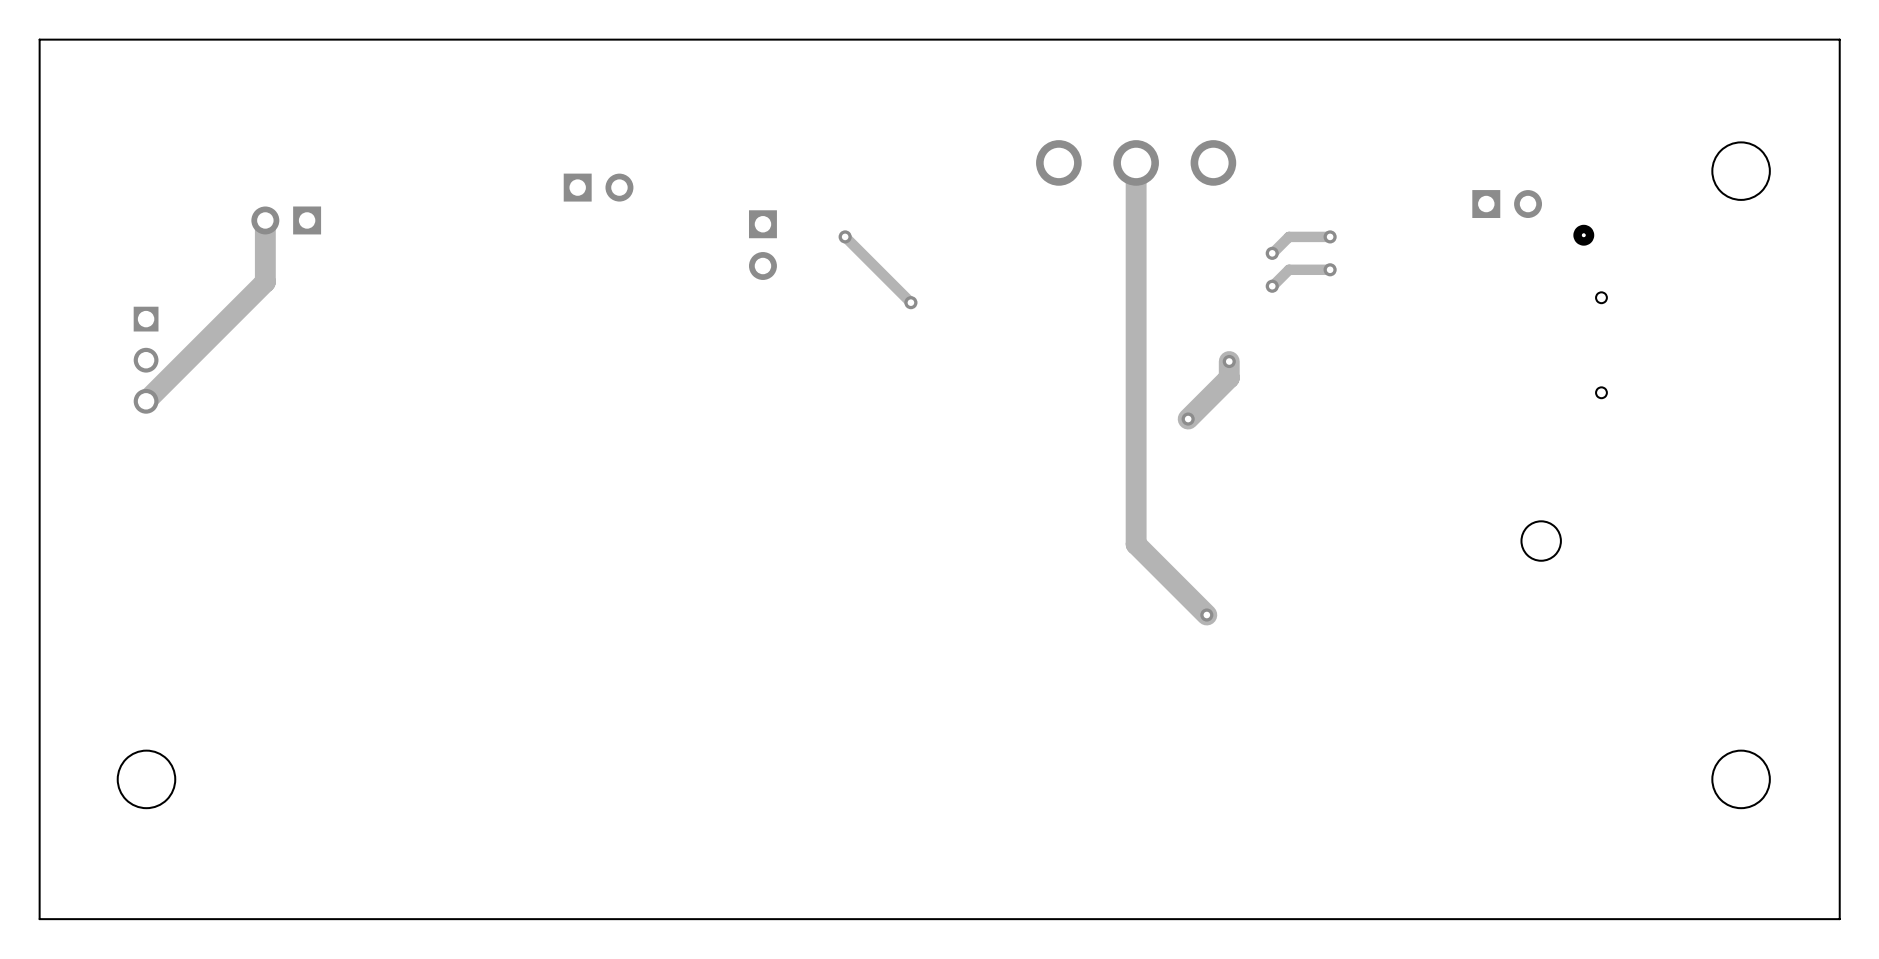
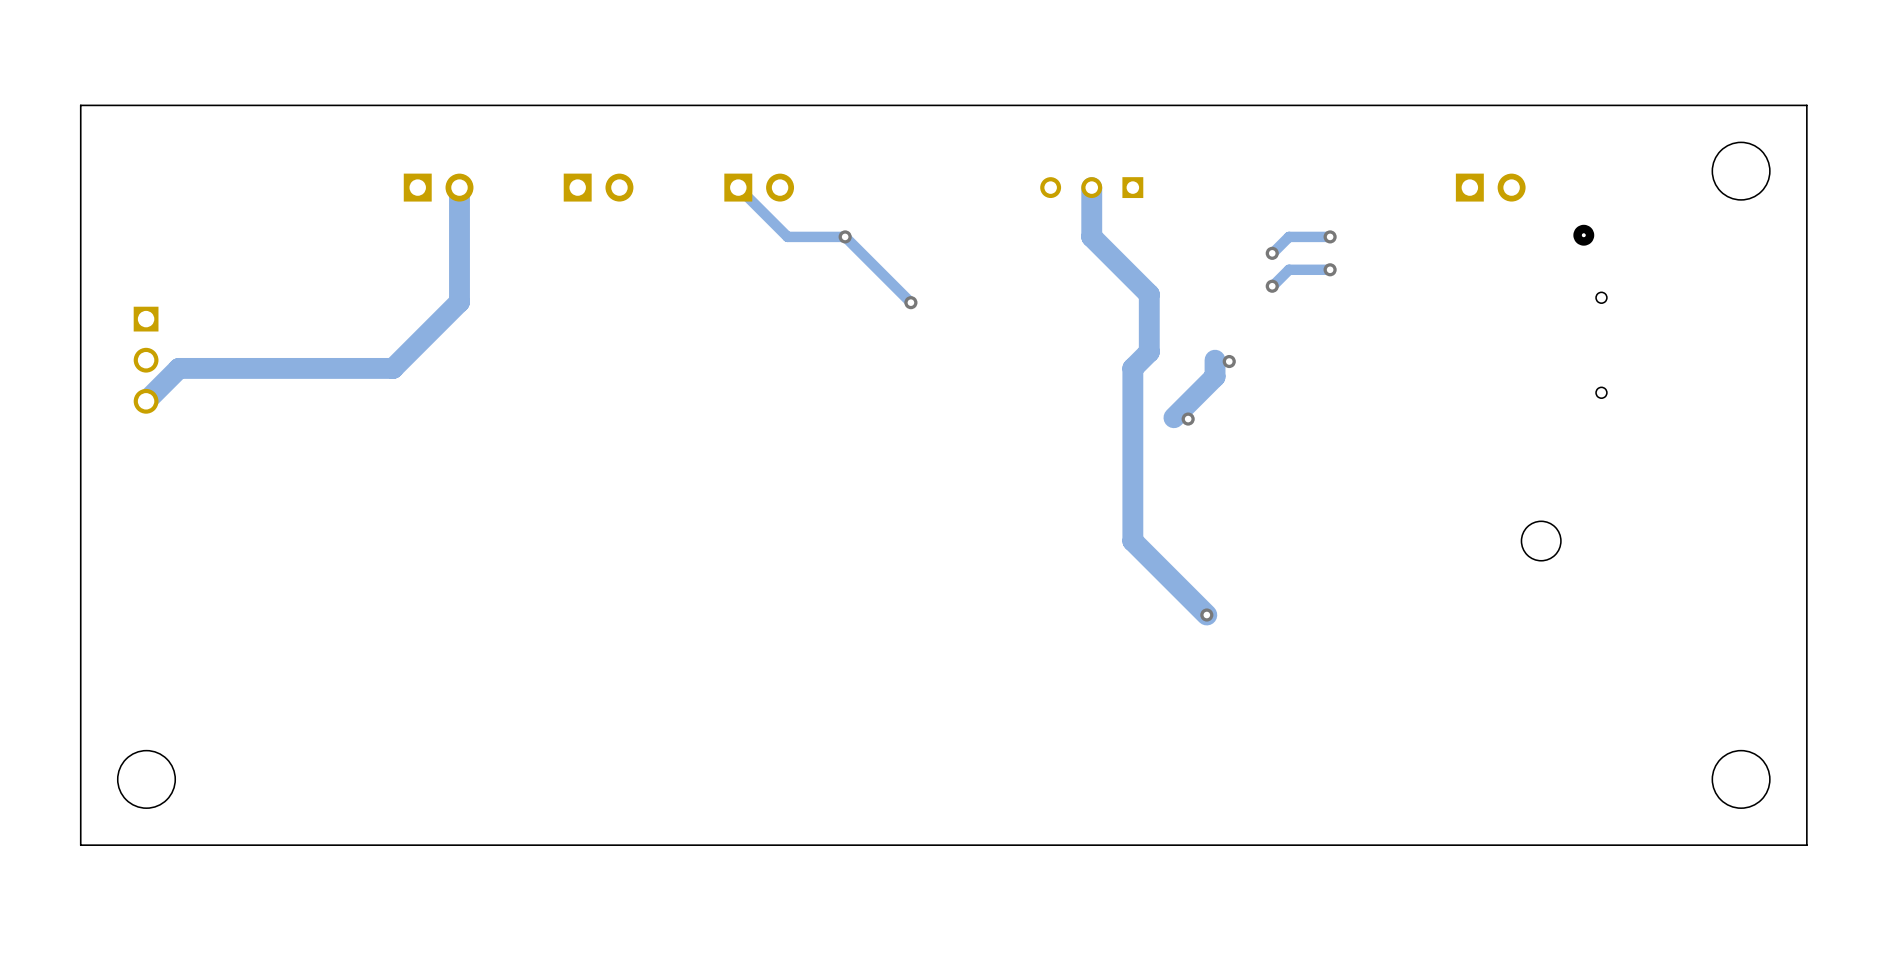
board edge: (1839, 39) (39, 39) (39, 919) (1839, 919) (1839, 39) -> (1806, 105) (1806, 845) (80, 845) (80, 105) (1806, 105)
track: (1136, 162) (1136, 544) -> (1091, 187) (1091, 236) (1149, 294) (1149, 351) (1132, 368) (1132, 541) (1136, 544)
part: (1136, 162) -> none
track: none -> (738, 187) (787, 236) (845, 236)
part: none -> (1091, 187)
part position: (1507, 204) -> (1490, 187)
track: (265, 220) (265, 282) (178, 368) -> (459, 187) (459, 302) (393, 368) (178, 368)
part rotation: 0° (286, 220) -> 180° (438, 187)
part position: (286, 220) -> (438, 187)
part rotation: 0° (762, 245) -> 90° counterclockwise (759, 187)
part position: (762, 245) -> (759, 187)
track: (1229, 361) (1229, 377) (1188, 419) -> (1215, 360) (1215, 376) (1173, 417)

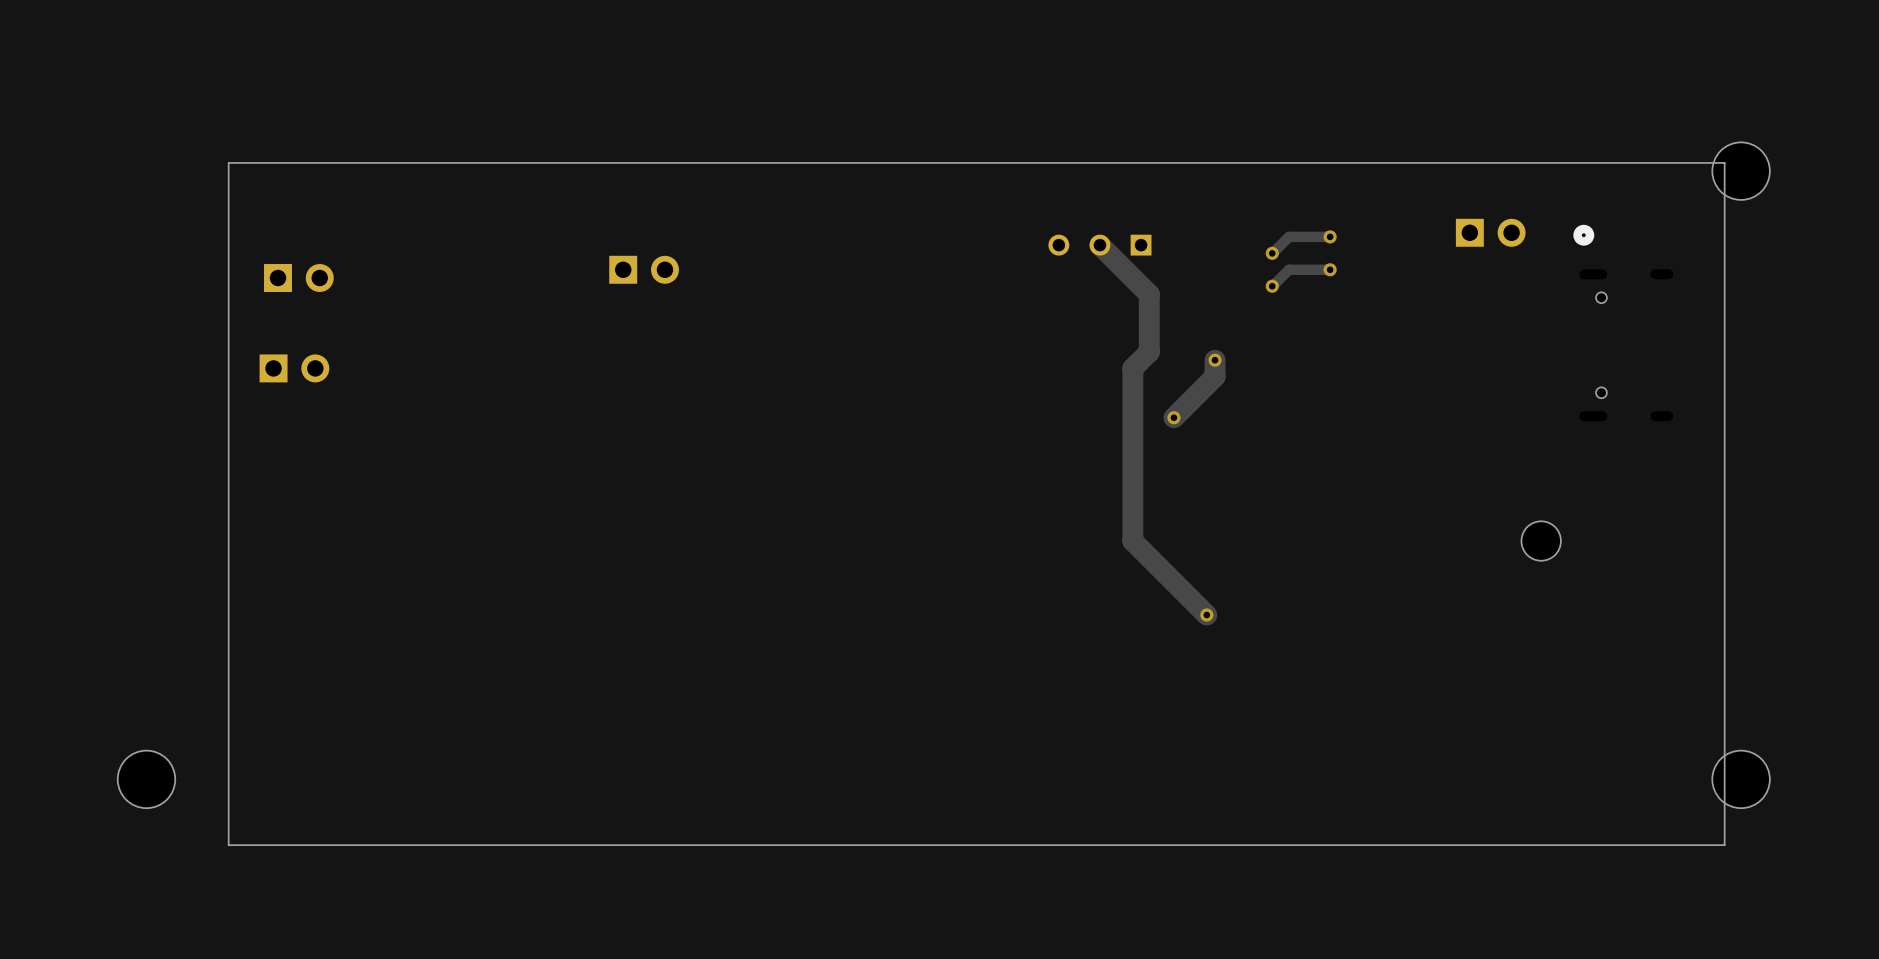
part: (438, 187) -> none
track: (459, 187) (459, 302) (393, 368) (178, 368) (146, 401) -> none
part: (598, 187) -> none
track: (738, 187) (787, 236) (845, 236) (910, 302) -> none
part: (759, 187) -> none
track: (1091, 187) (1091, 236) (1099, 245) -> none
part position: (1091, 187) -> (1099, 245)
part position: (1490, 187) -> (1490, 232)
via: (845, 236) -> none
part: none -> (644, 269)
part: none -> (298, 278)
via: (910, 302) -> none
part: (146, 360) -> none
via position: (1229, 361) -> (1215, 360)
part: none -> (294, 368)
via position: (1188, 419) -> (1173, 417)
board edge: (1724, 845) (1806, 845) (1806, 105) (80, 105) (80, 845) (228, 845) -> (1724, 845) (1724, 162) (228, 162) (228, 845)

